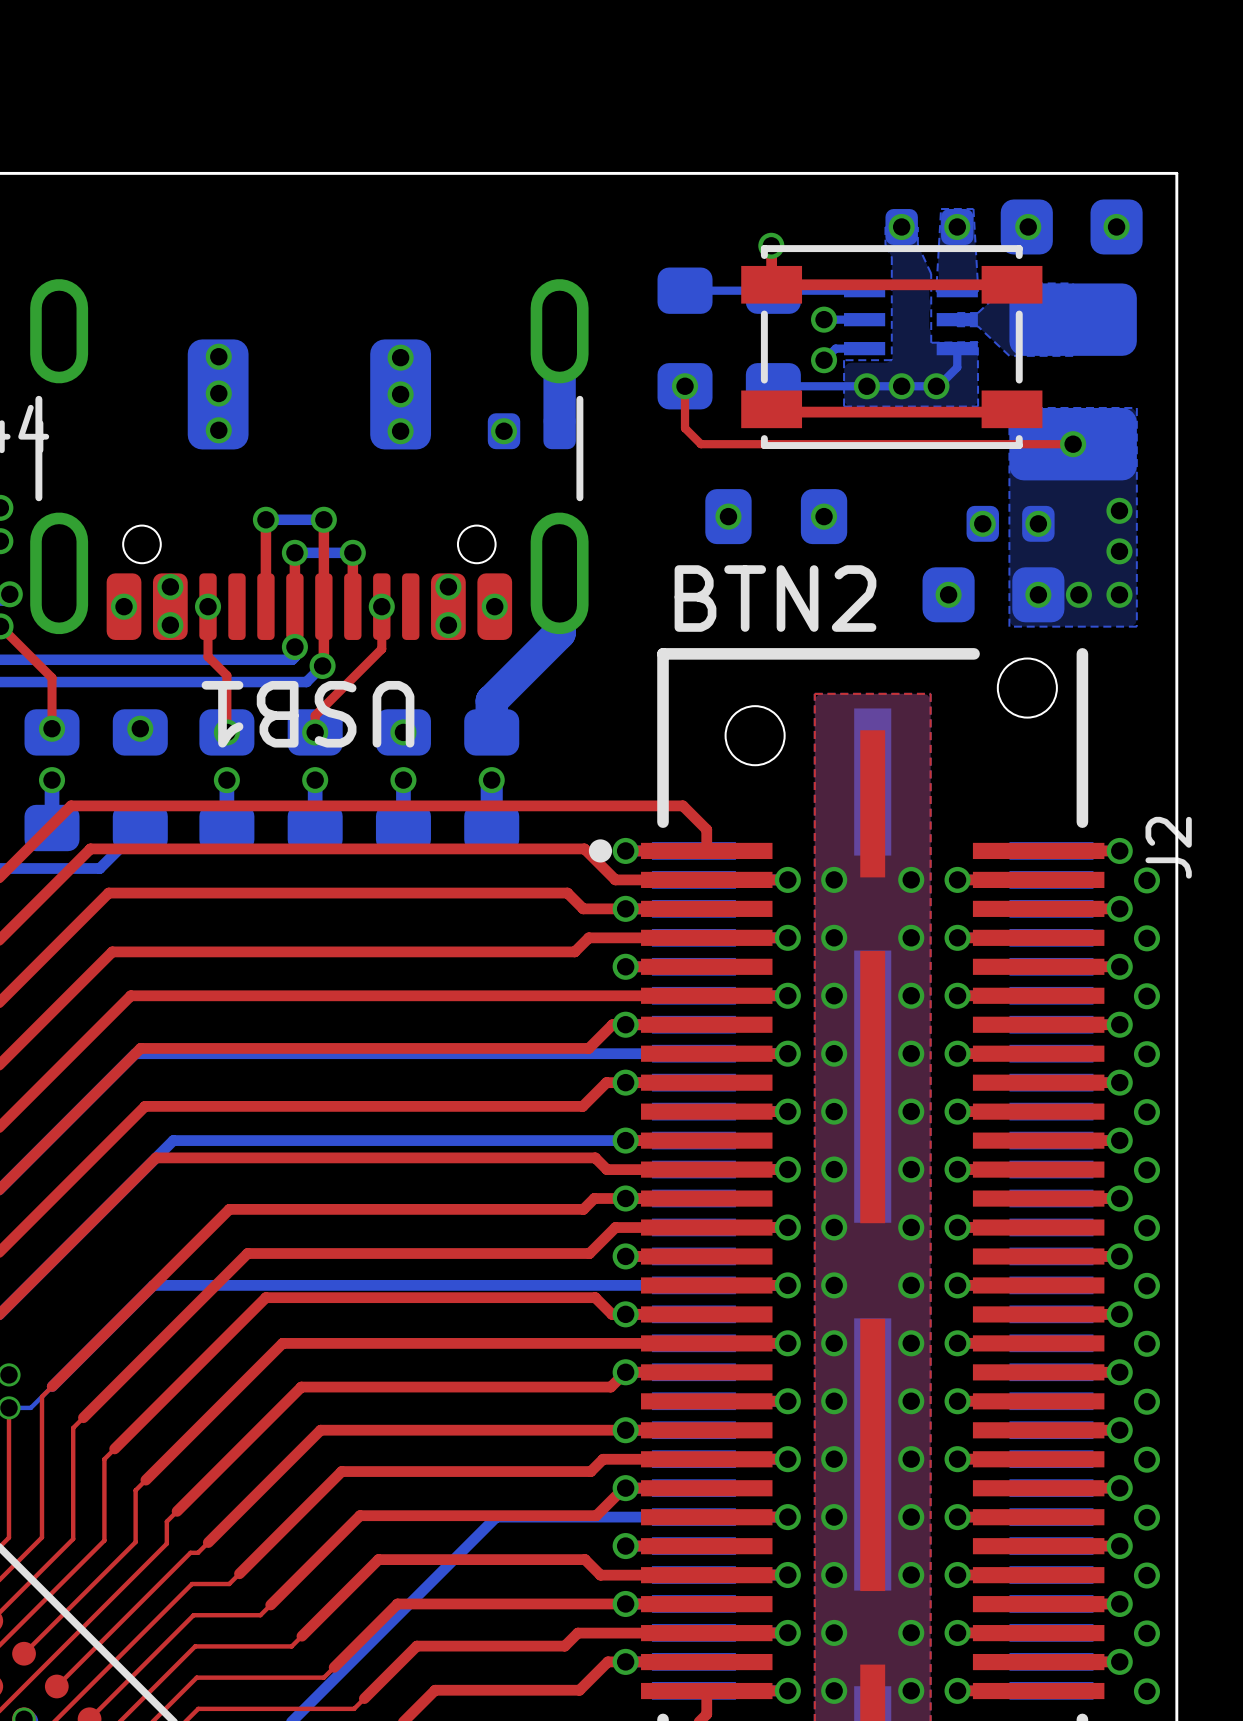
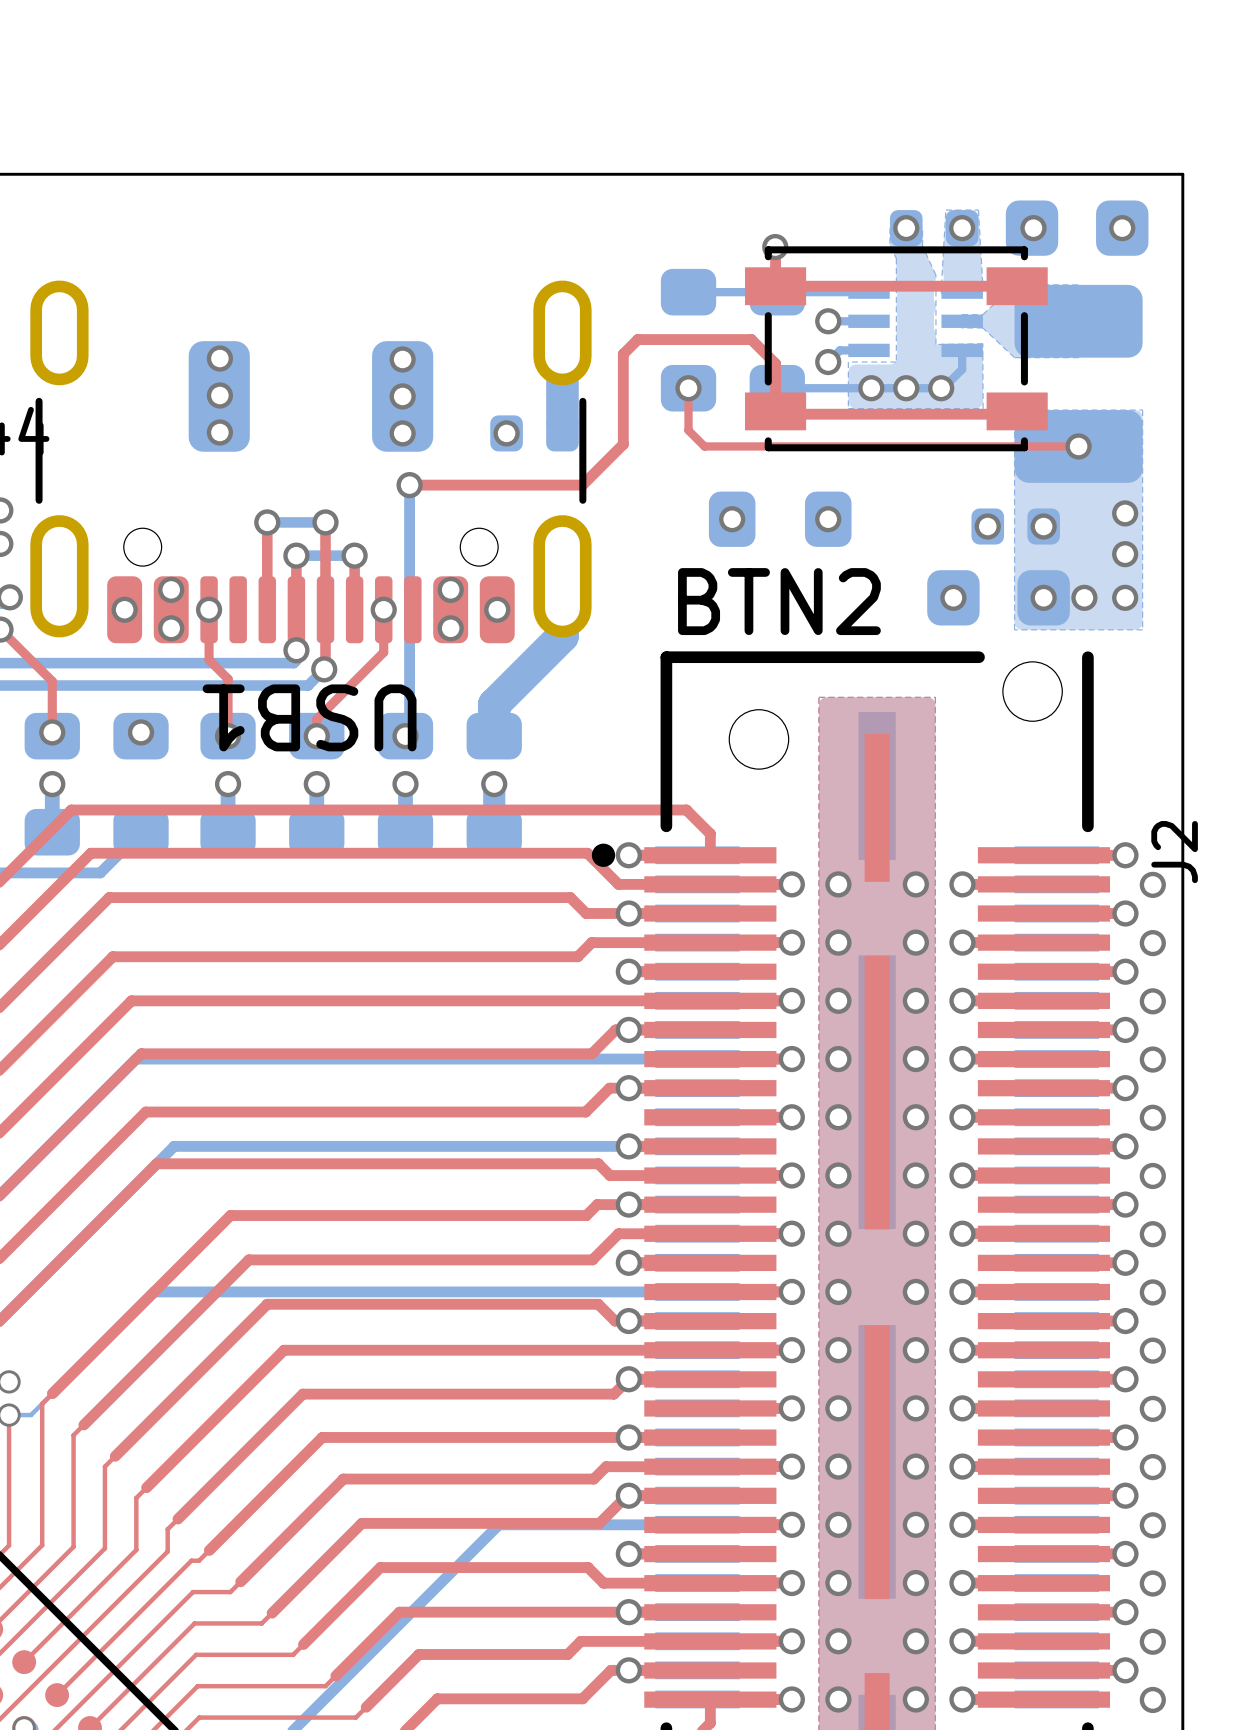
top track: none -> (775, 411) (775, 363) (751, 339) (637, 339) (623, 354) (623, 444) (582, 485) (409, 485)
bottom track: none -> (409, 485) (409, 732) (405, 736)
via: none -> (409, 485)

